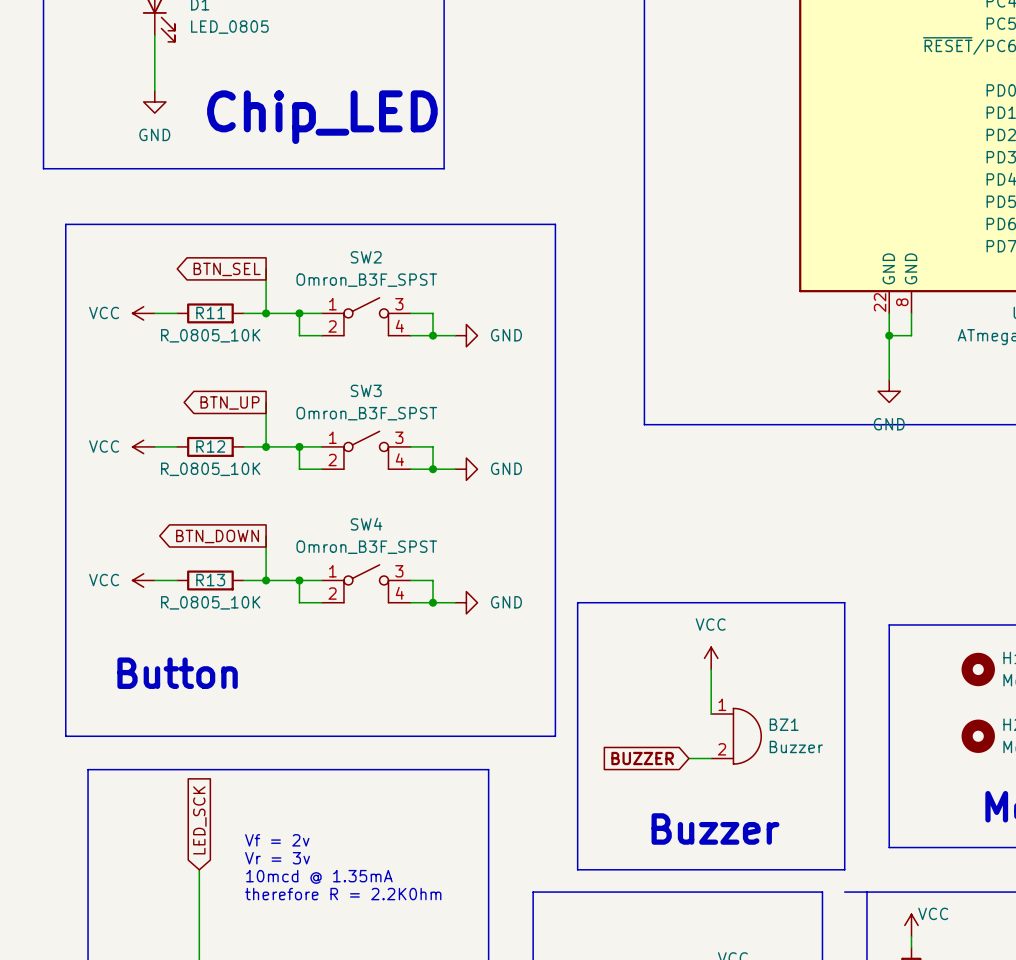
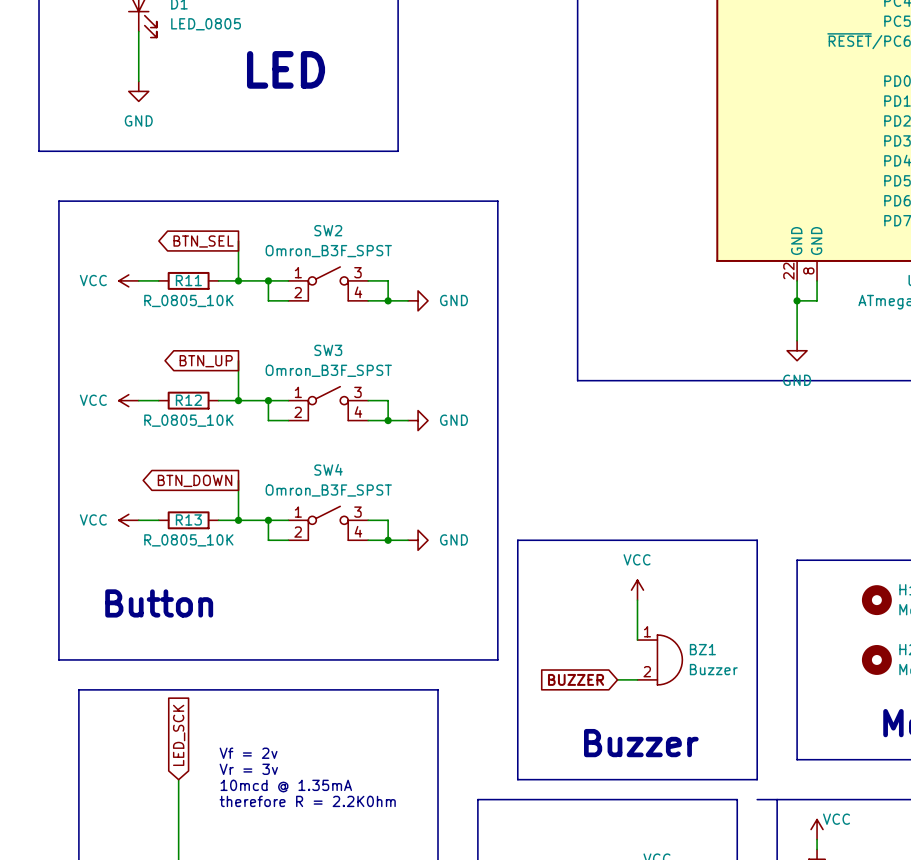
text: none -> LED (286, 69)
text: Chip_LED (322, 117) -> none

